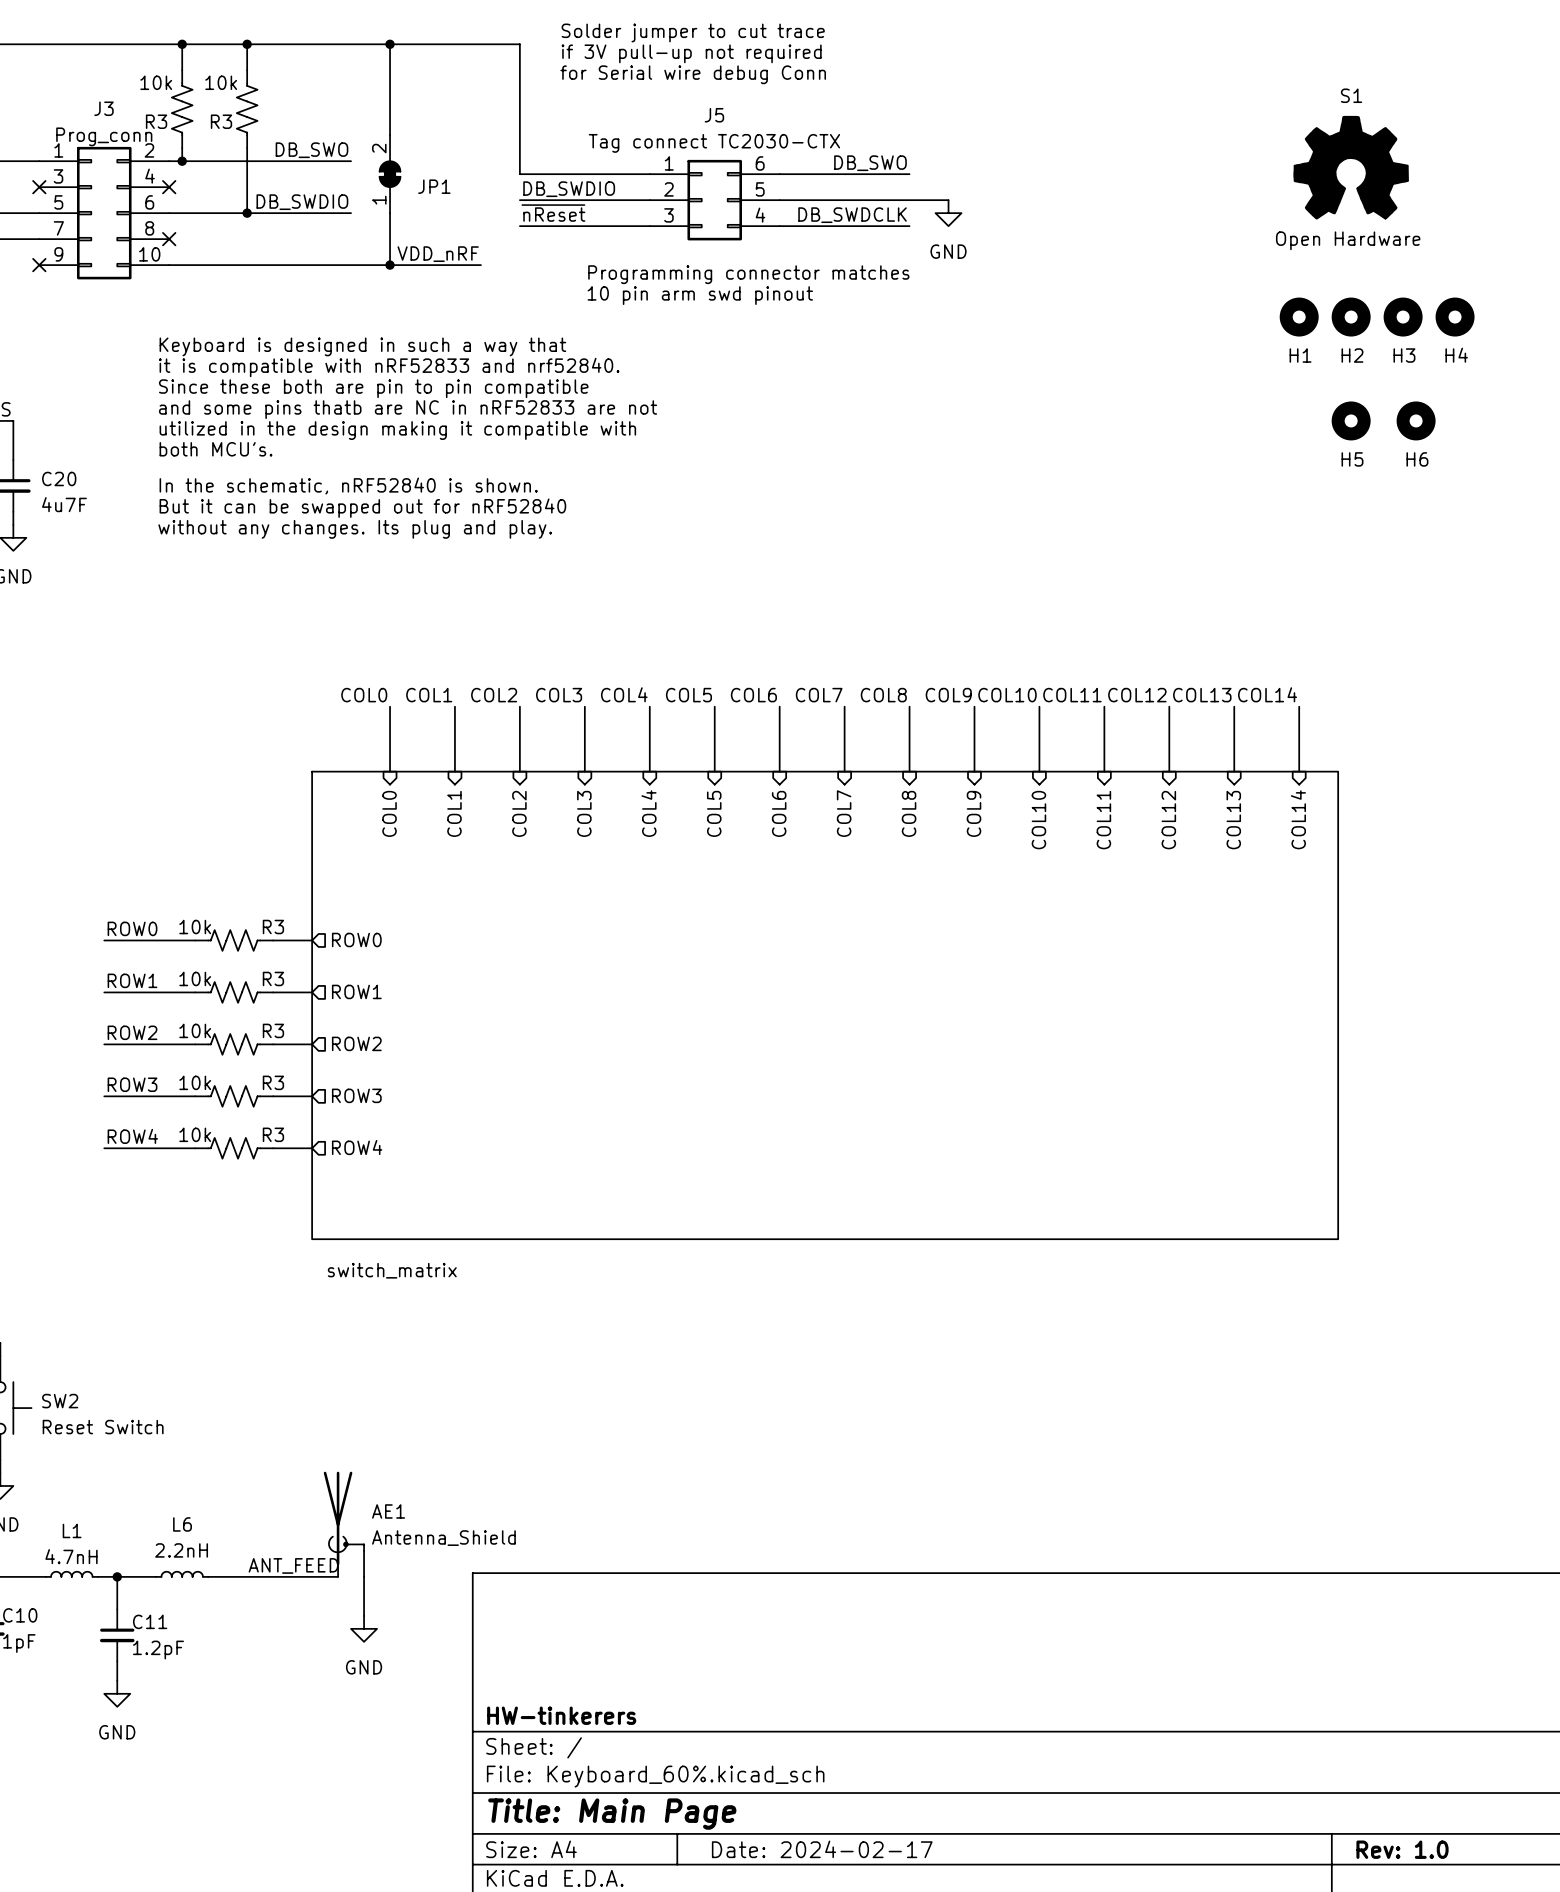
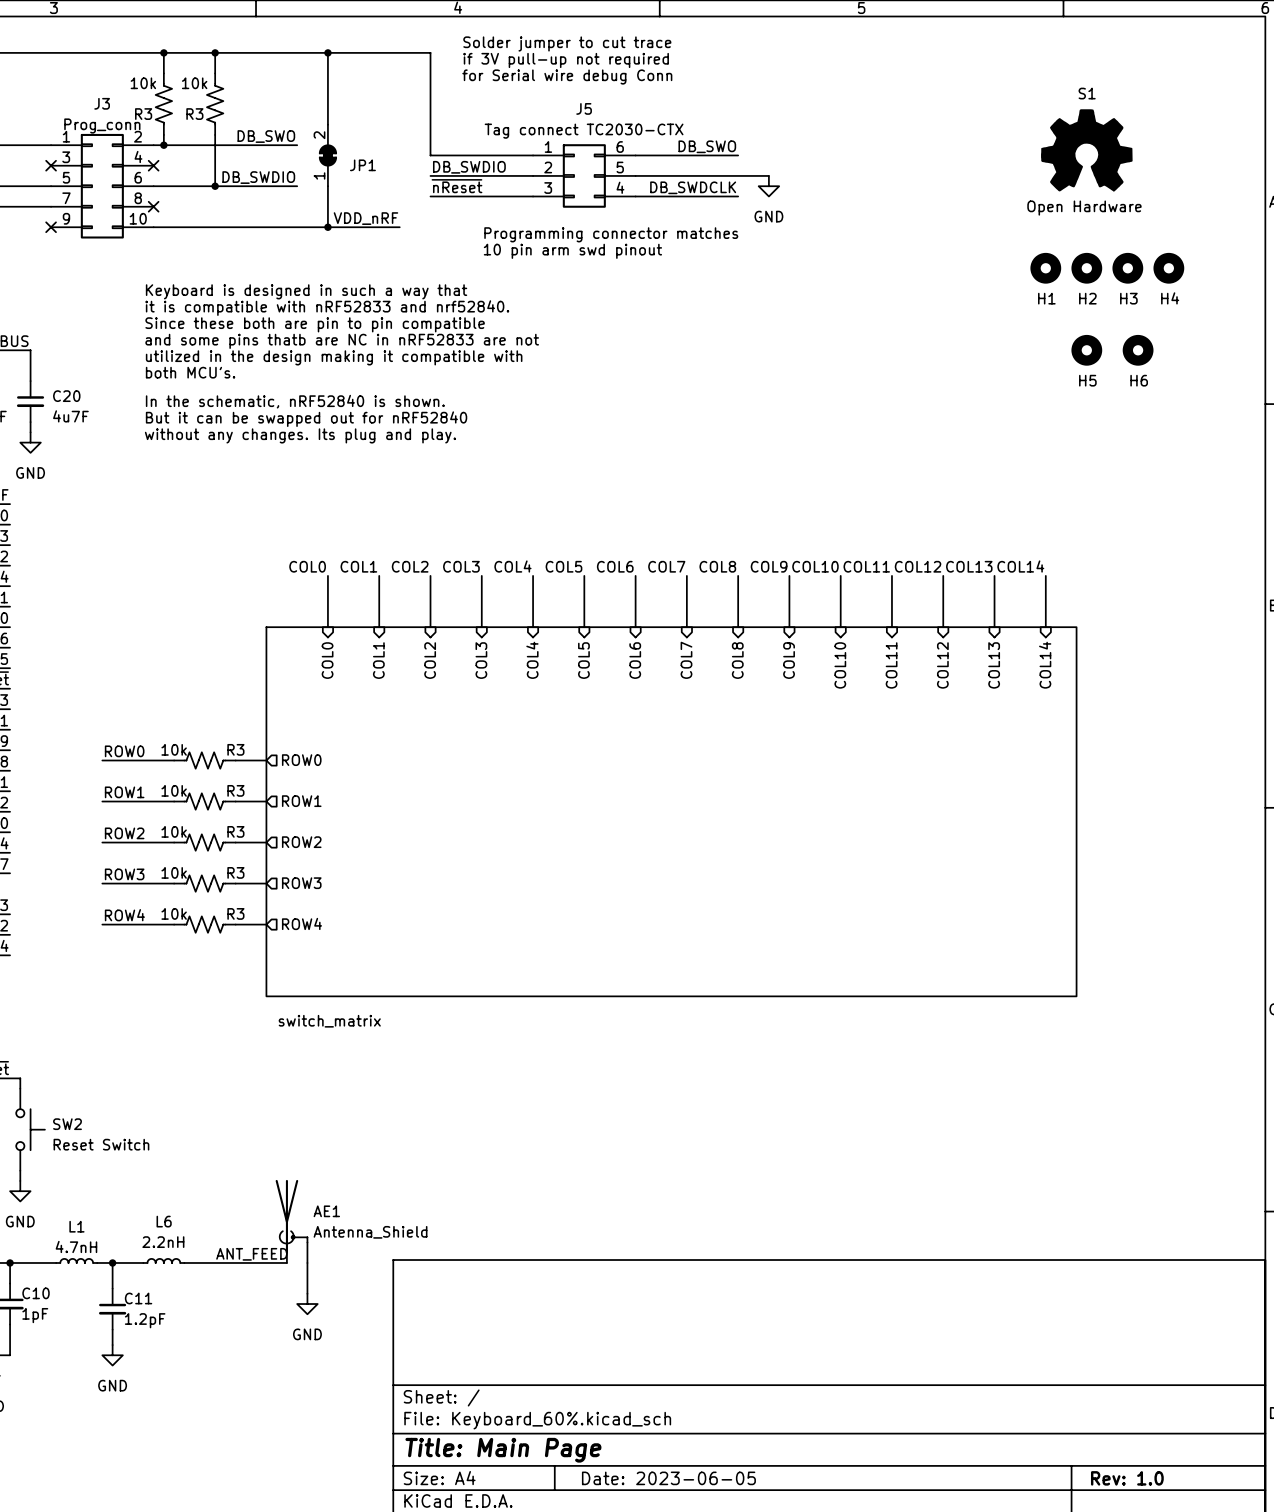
title block: HW-tinkerers (561, 1715) -> none
title block: Date: 2024-02-17 (822, 1849) -> Date: 2023-06-05 (668, 1478)

